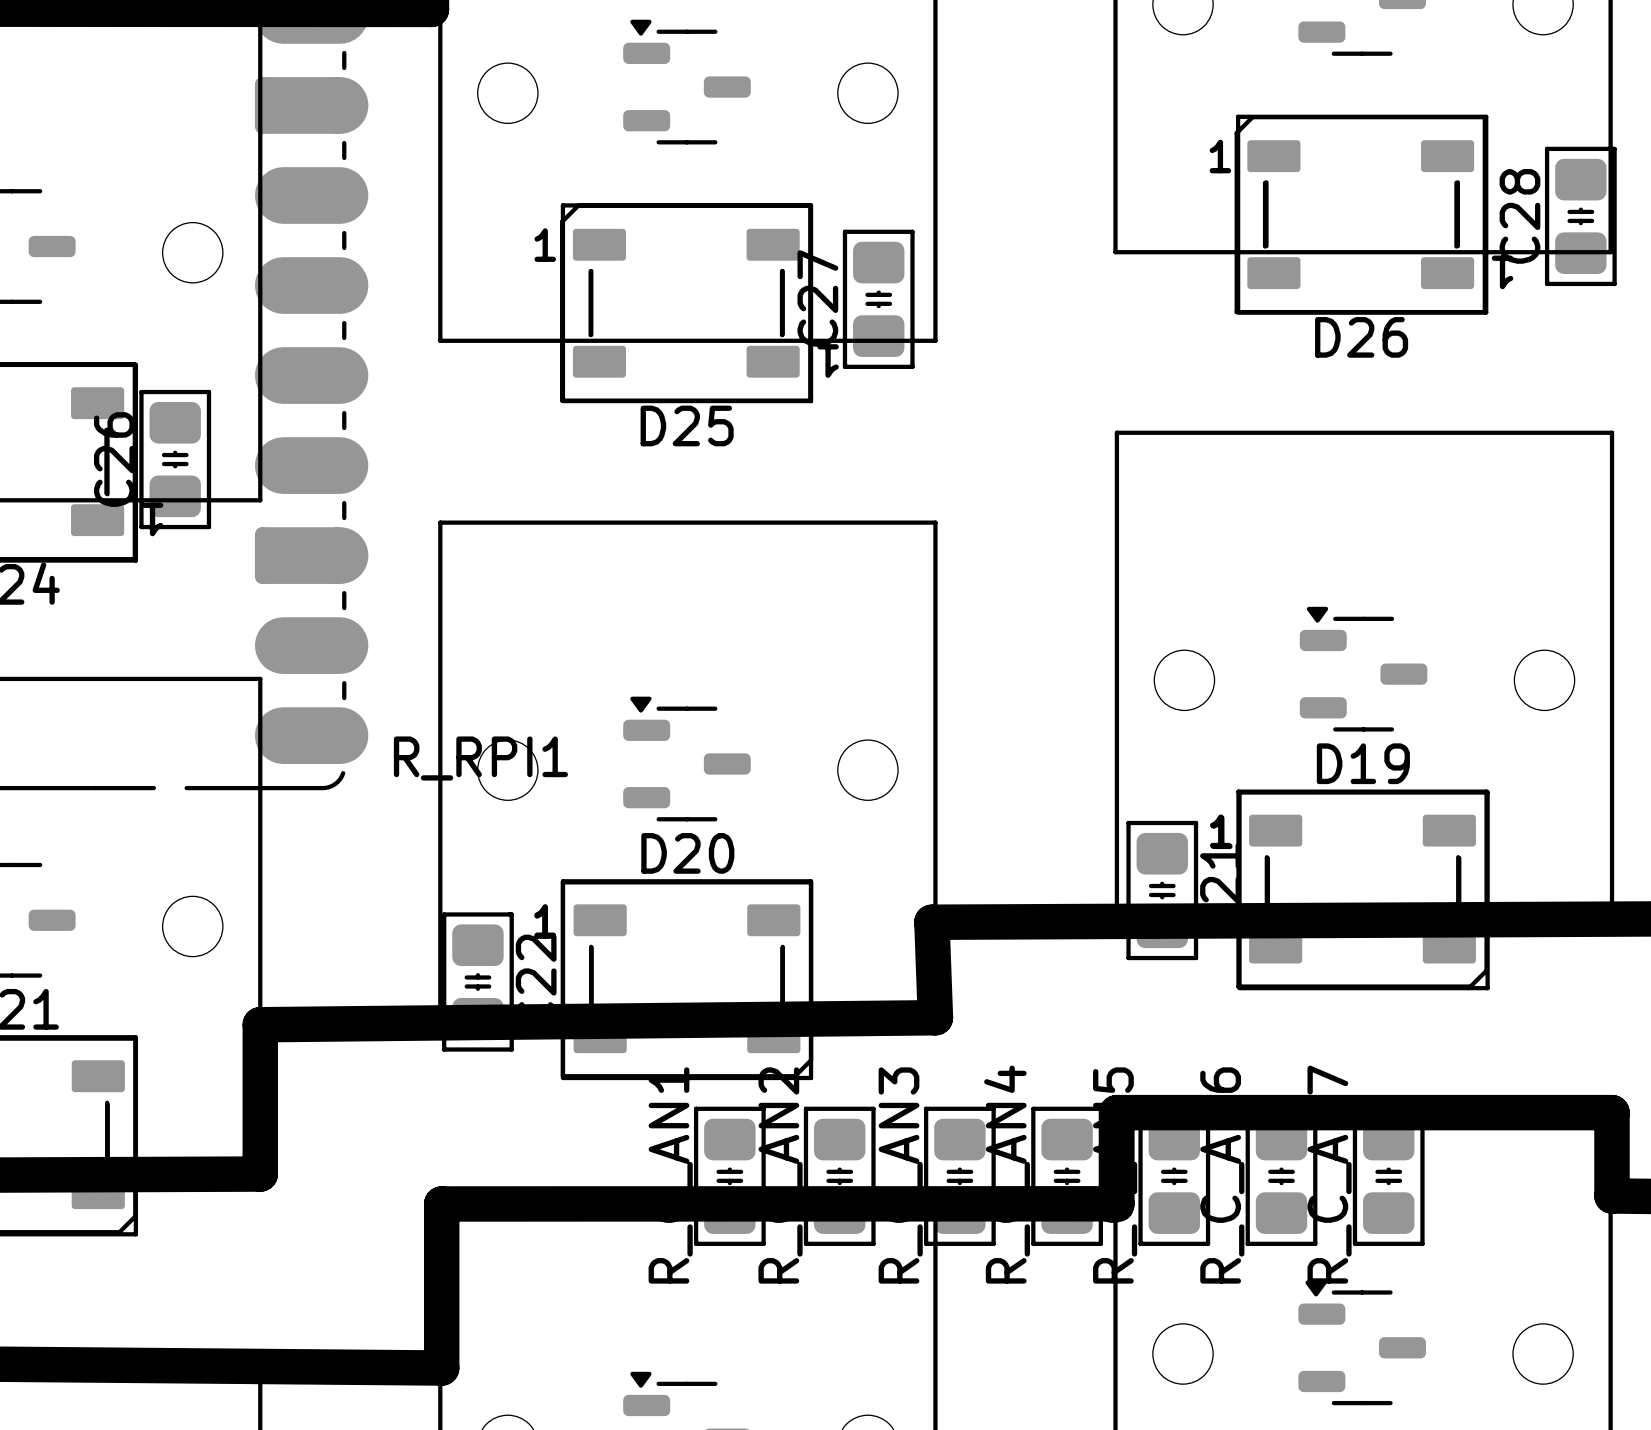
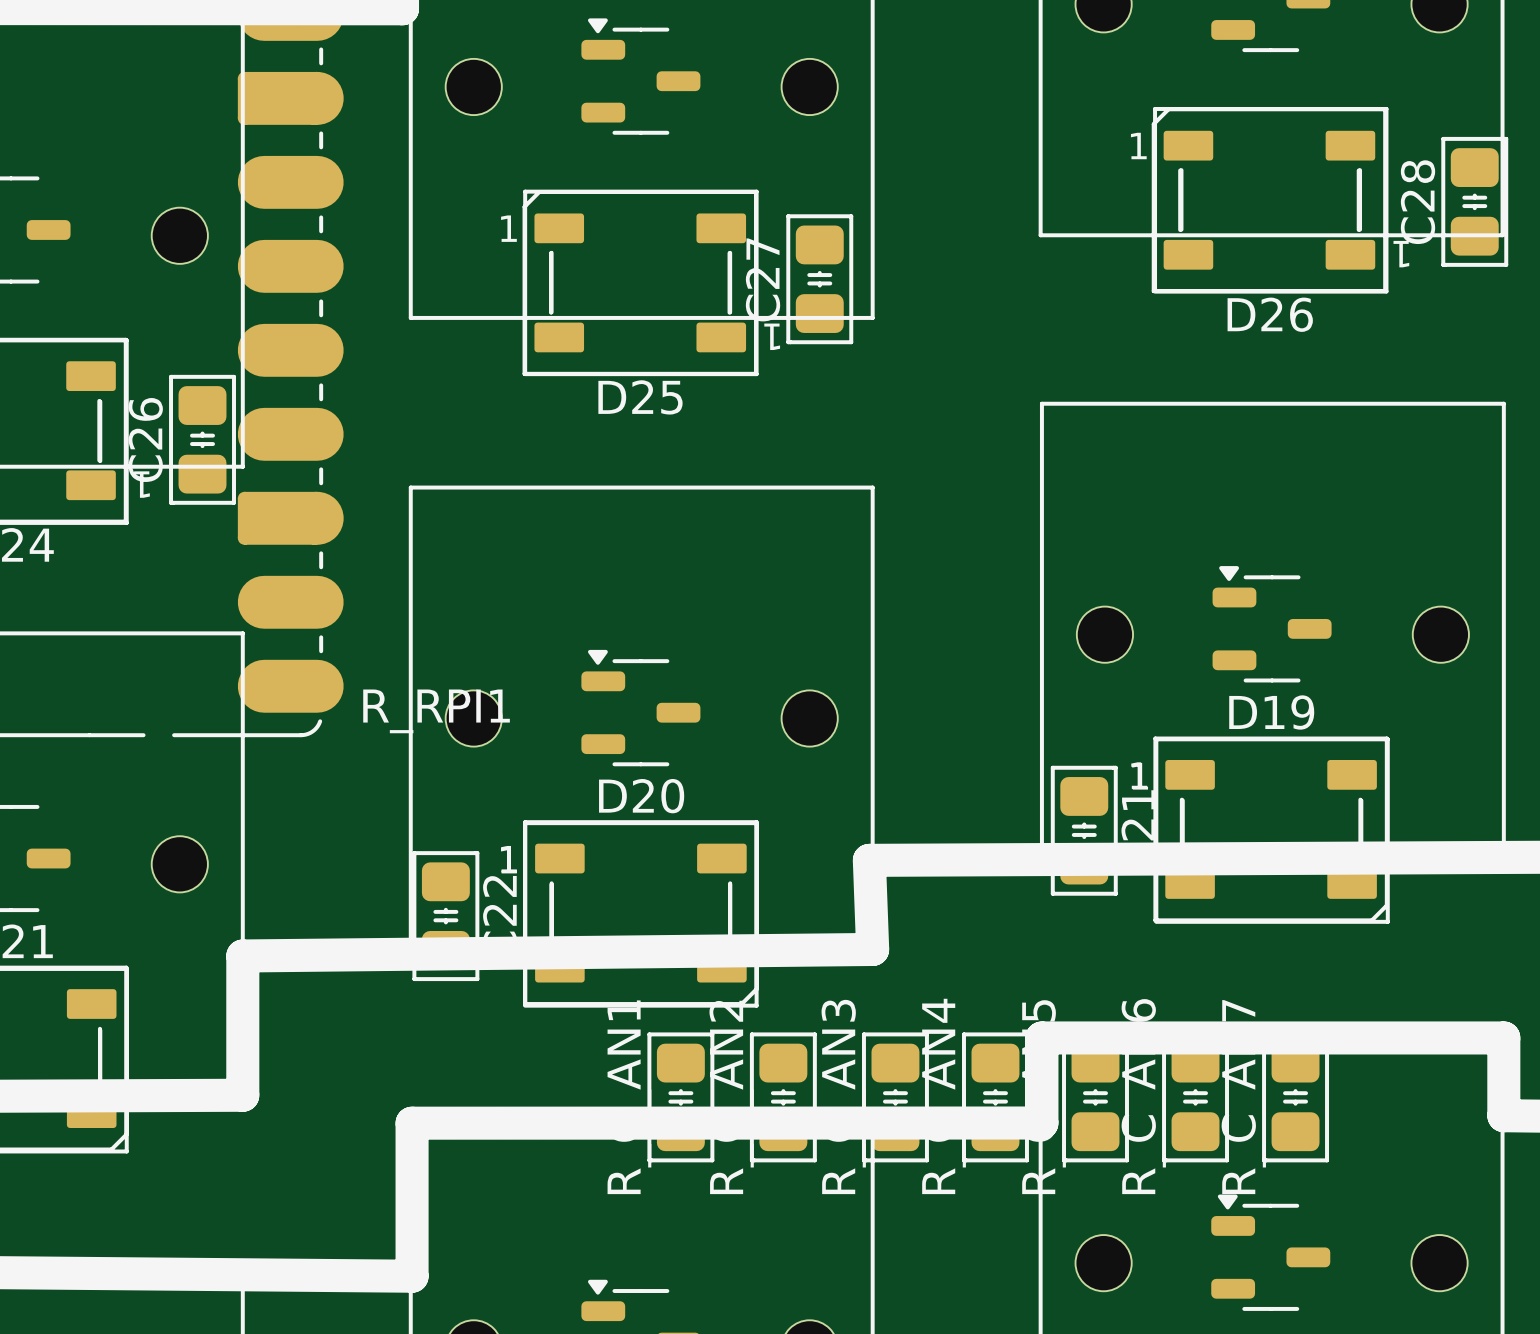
C26 position: (175, 459) -> (202, 439)

